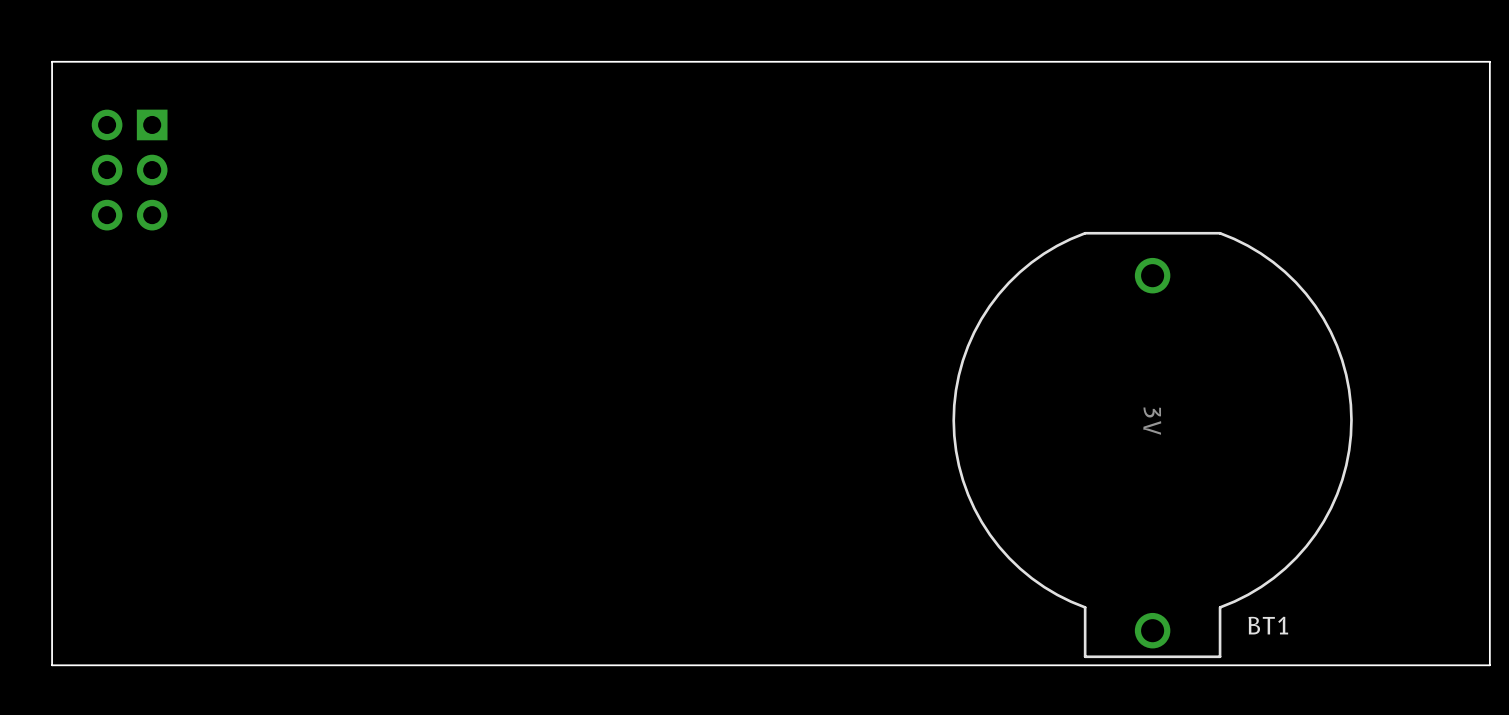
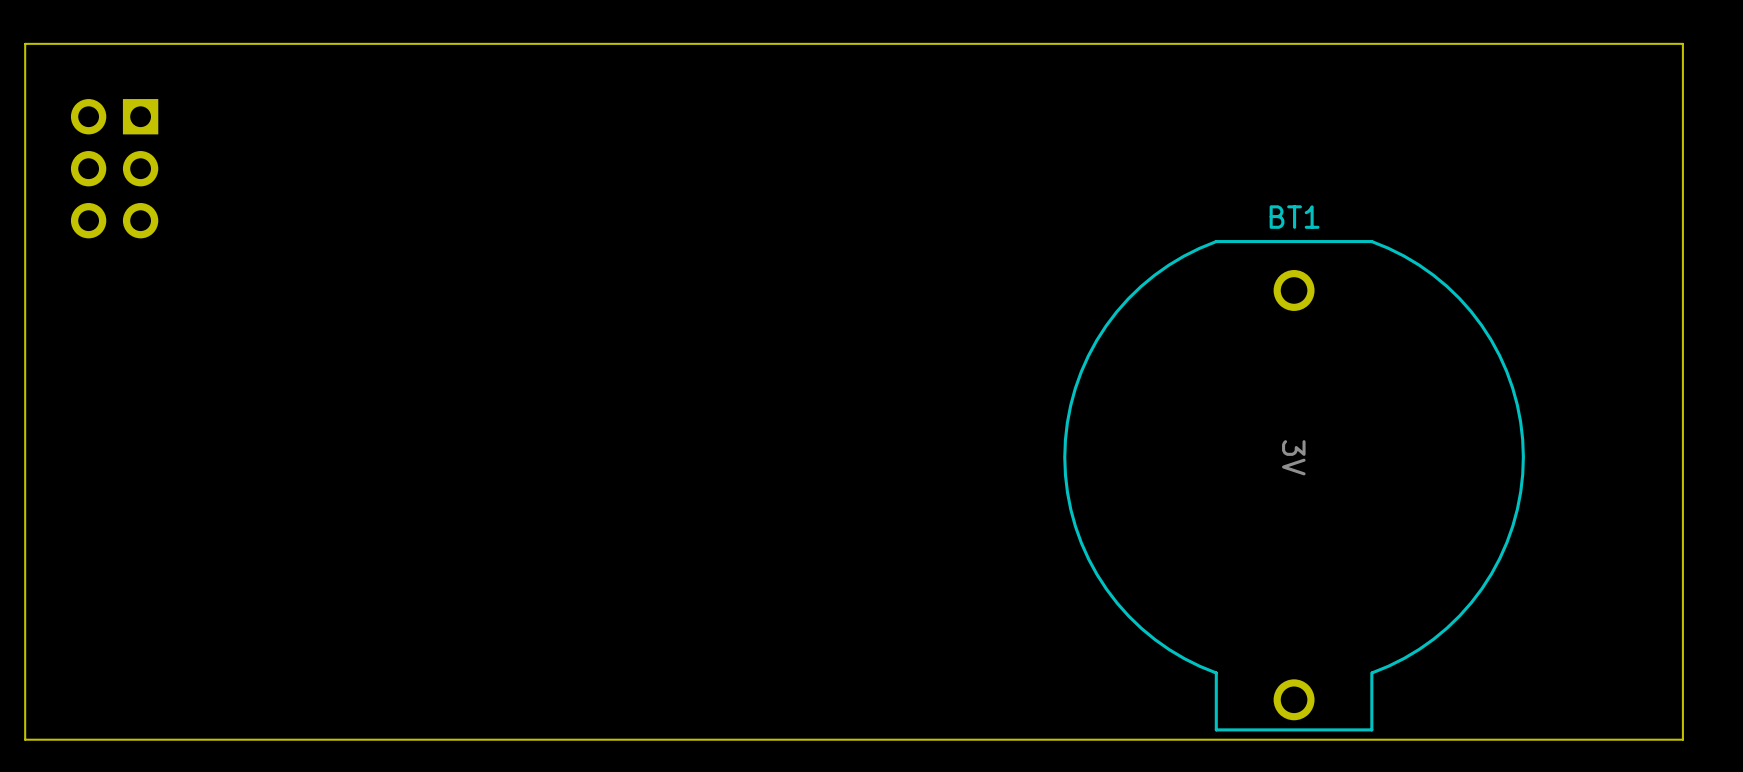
BT1 name position: BT1 (1268, 625) -> BT1 (1294, 217)

